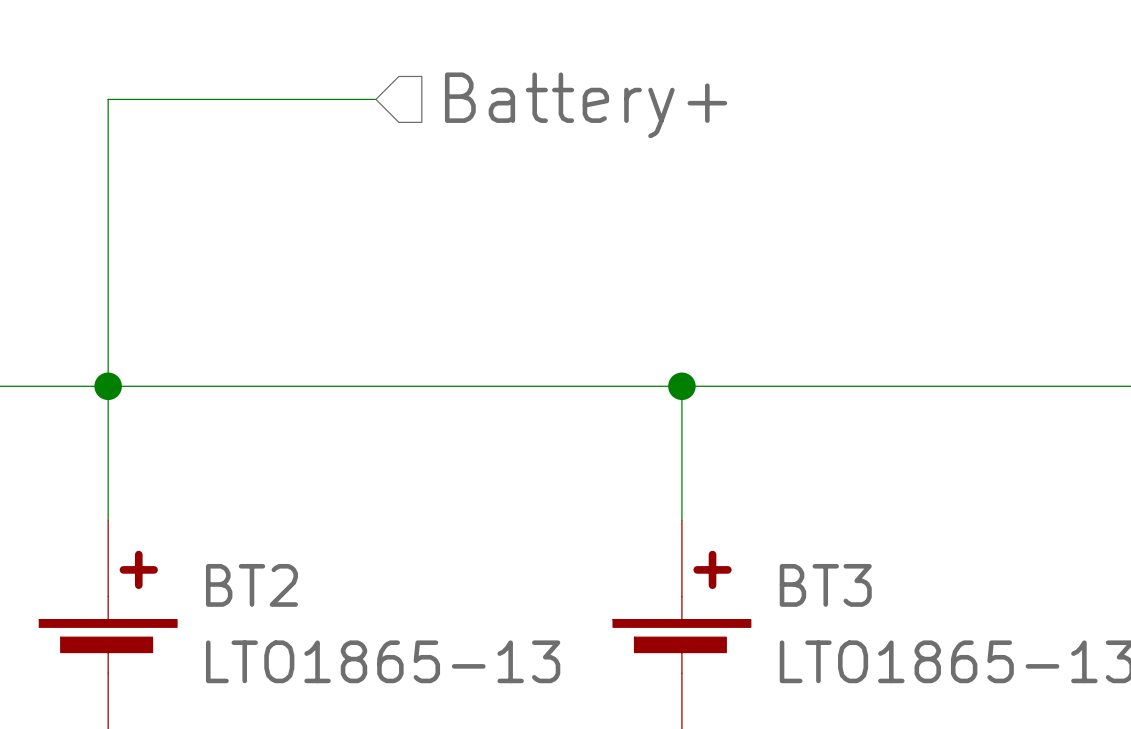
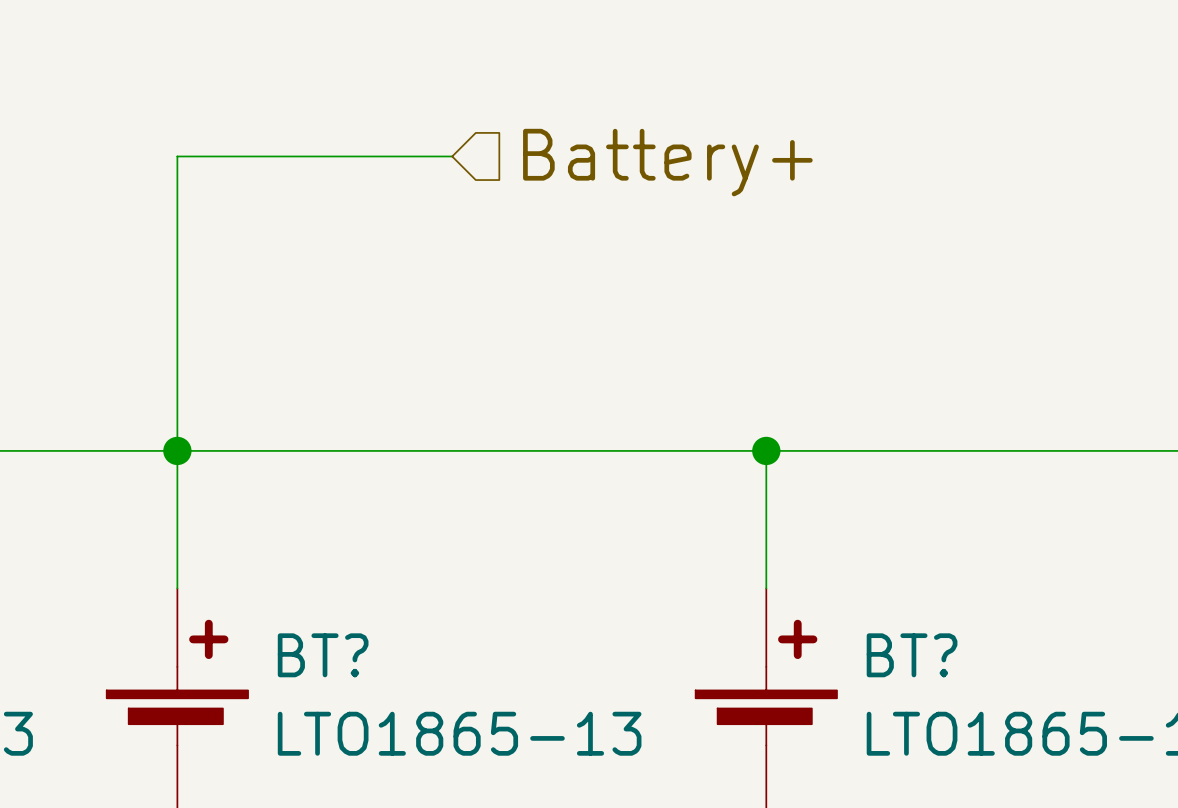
BT2 name: BT2 (251, 585) -> BT? (323, 655)
BT3 name: BT3 (825, 585) -> BT? (912, 655)

